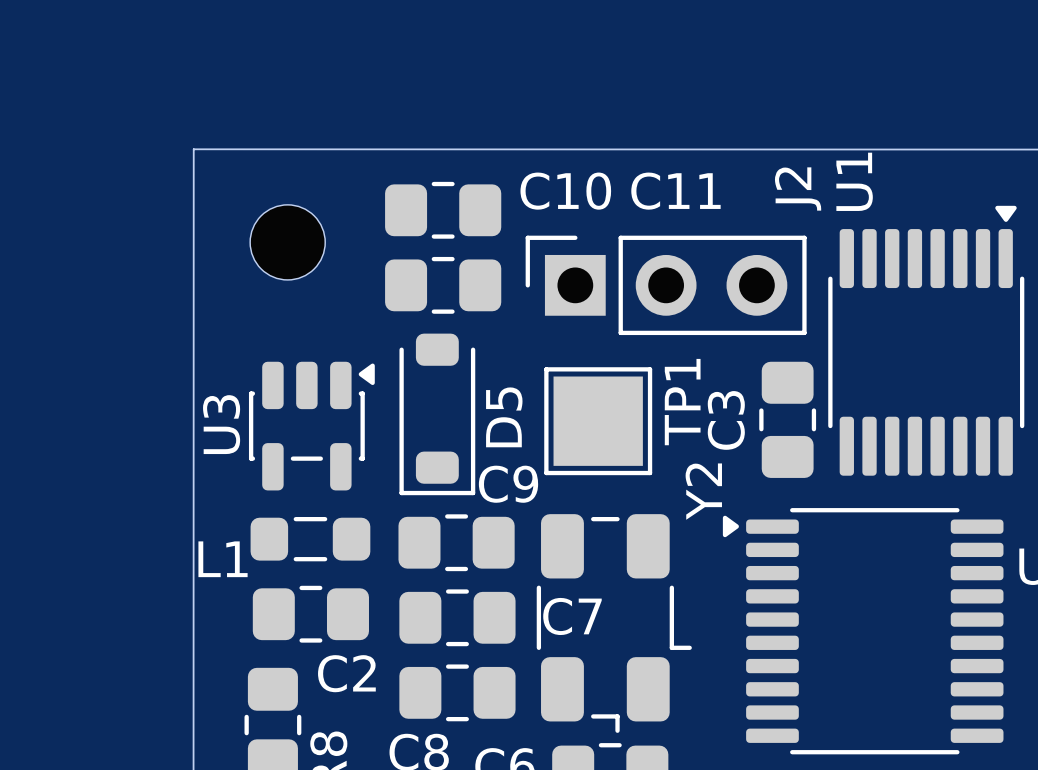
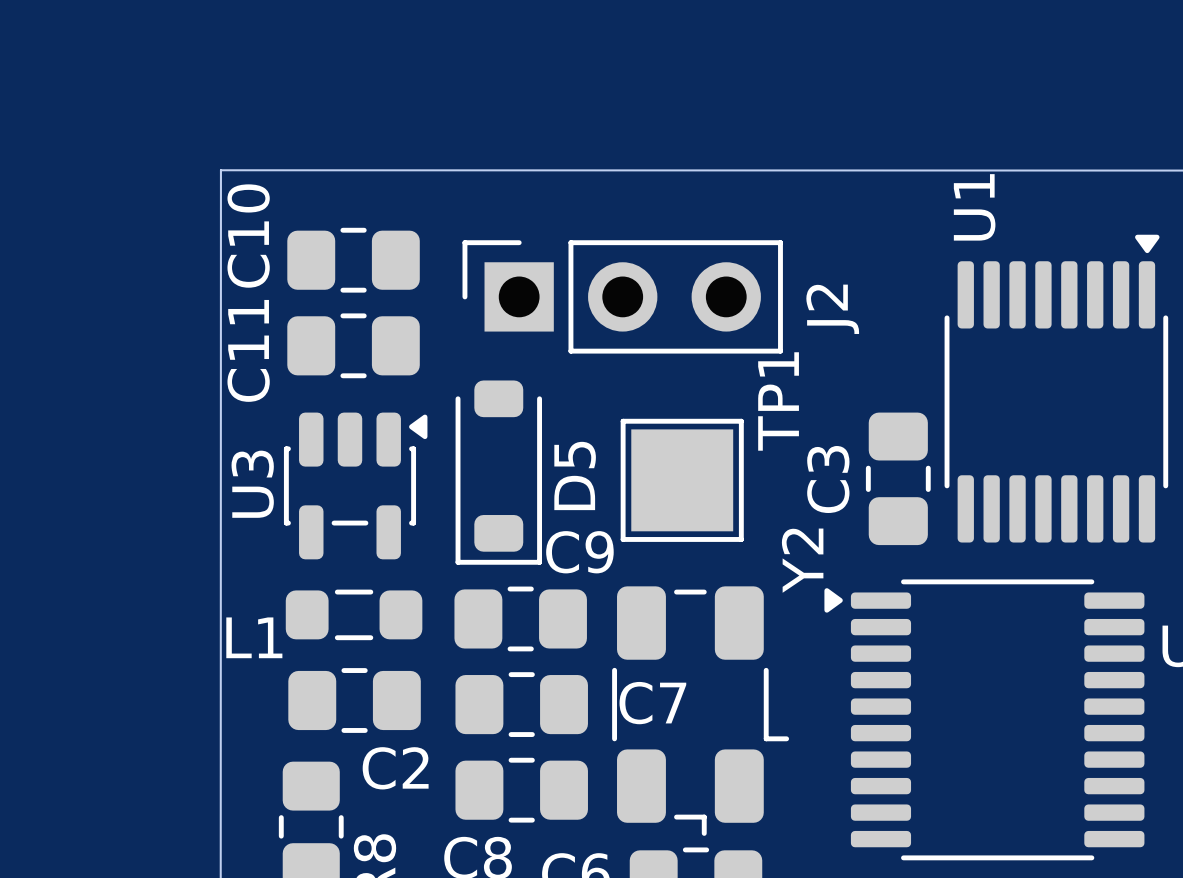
J2 name position: J2 (798, 188) -> J2 (832, 309)
C10 name rotation: 0° (565, 191) -> 90° counterclockwise (248, 236)
C10 name position: C10 (565, 191) -> C10 (248, 236)
C11 name rotation: 0° (675, 191) -> 90° counterclockwise (248, 350)
C11 name position: C11 (675, 191) -> C11 (248, 350)
C10 position: (443, 210) -> (353, 260)
part: (287, 242) -> none
C11 position: (443, 285) -> (353, 345)
J2 position: (666, 285) -> (622, 296)
TP1 name position: TP1 (682, 402) -> TP1 (778, 401)

